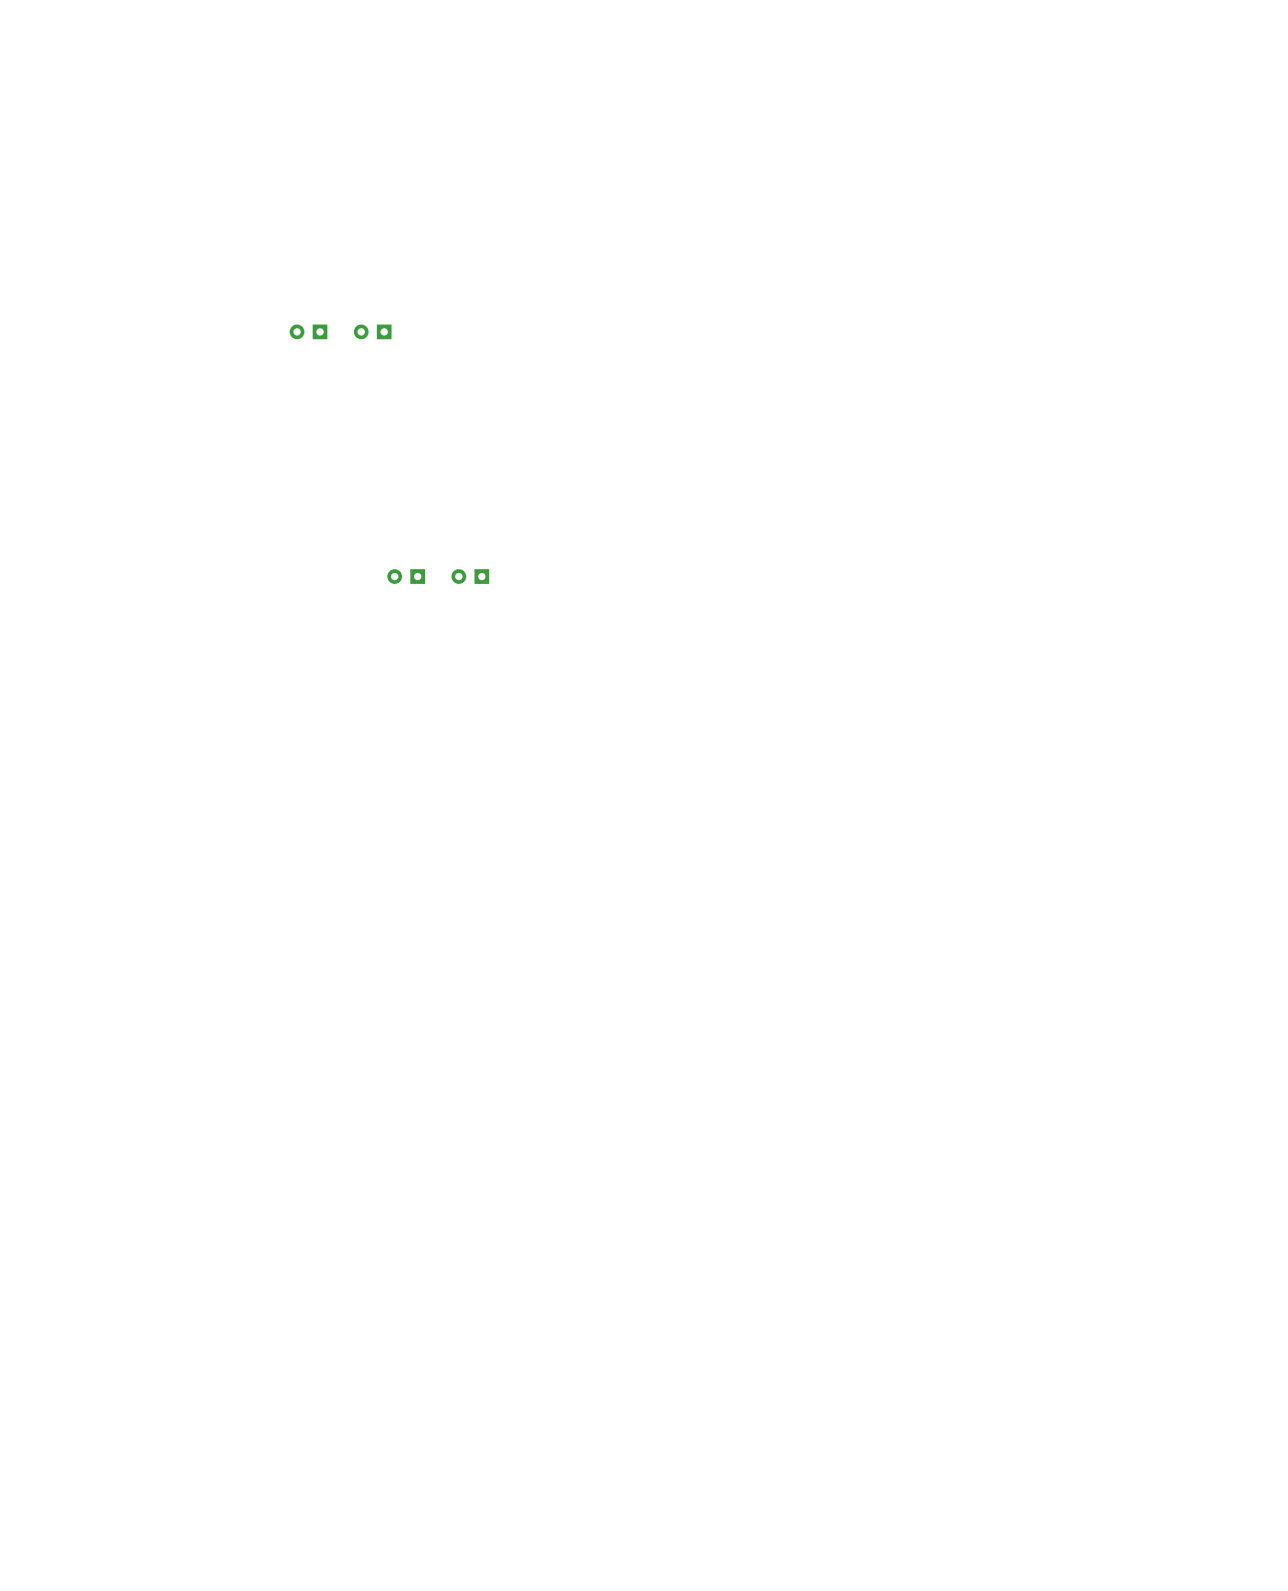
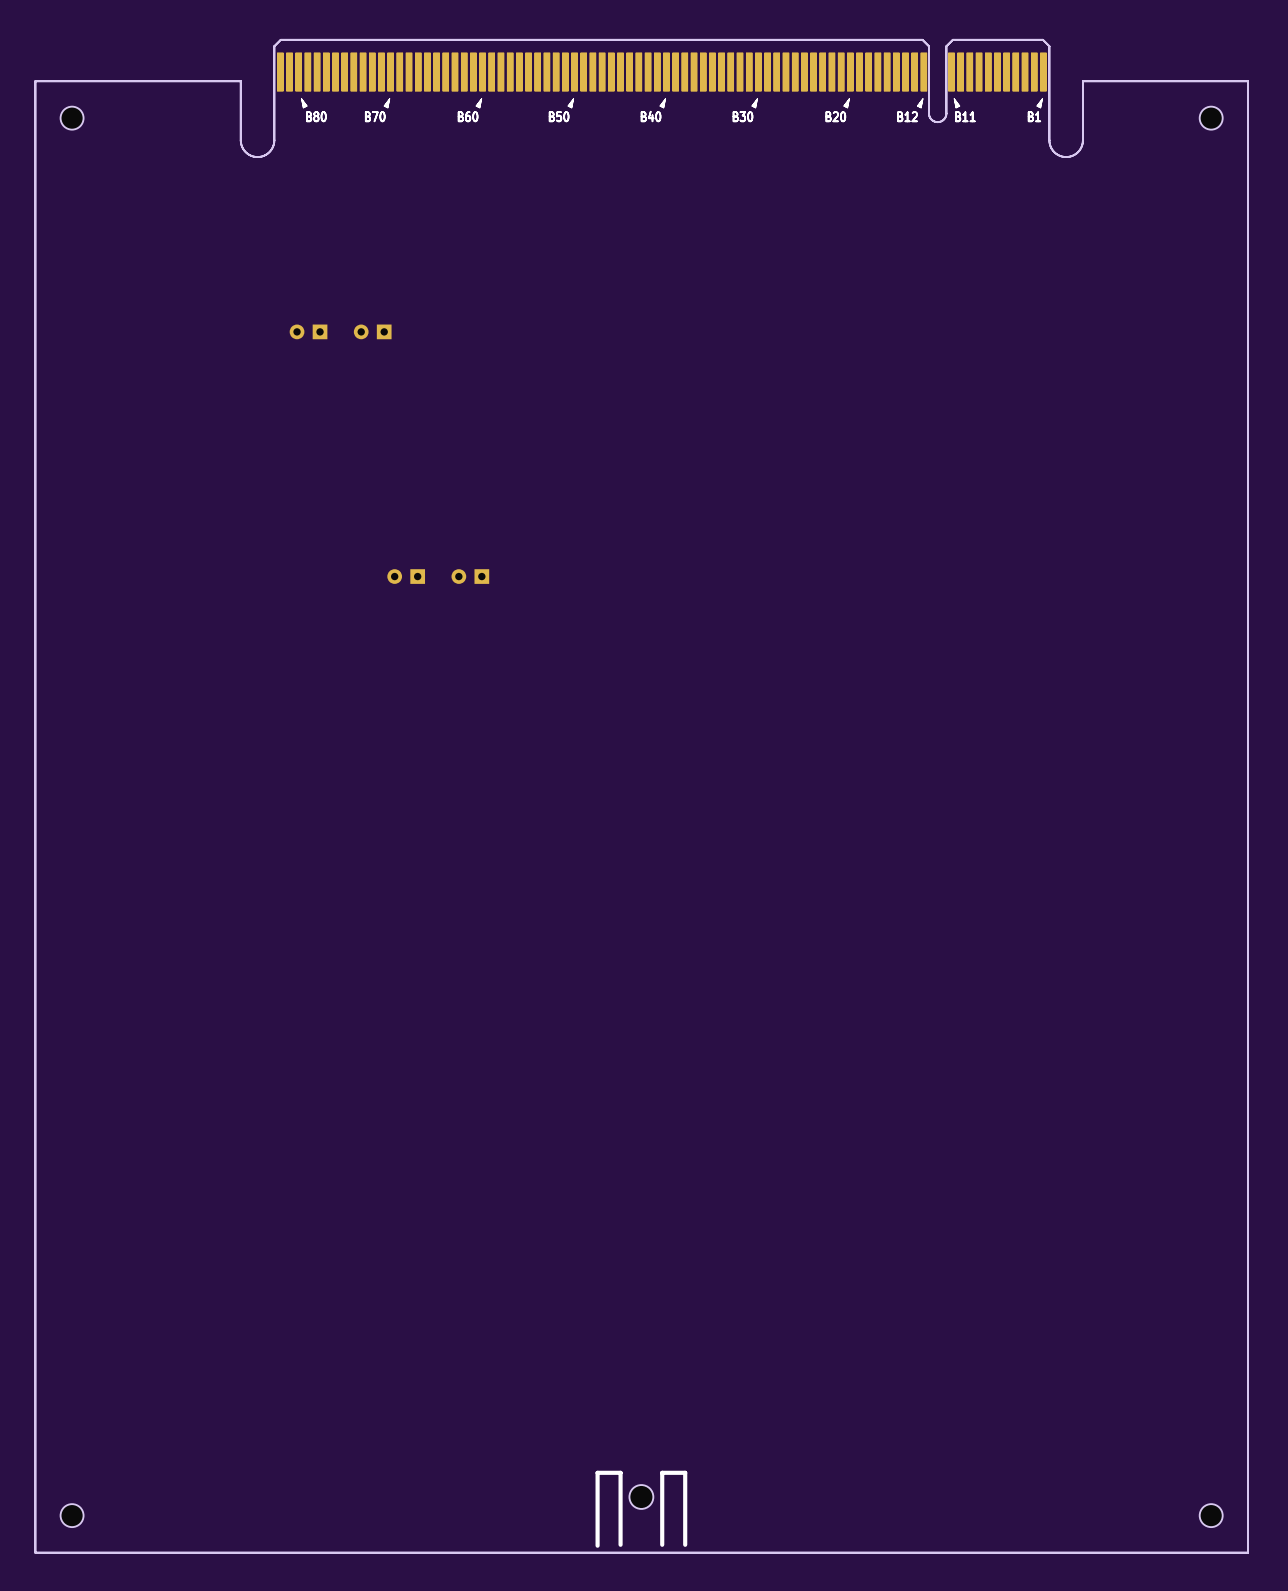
part: none -> (72, 118)
part: none -> (1211, 118)
part: none -> (641, 796)
part: none -> (641, 796)
part: none -> (641, 1509)
part: none -> (72, 1515)
part: none -> (1211, 1515)

